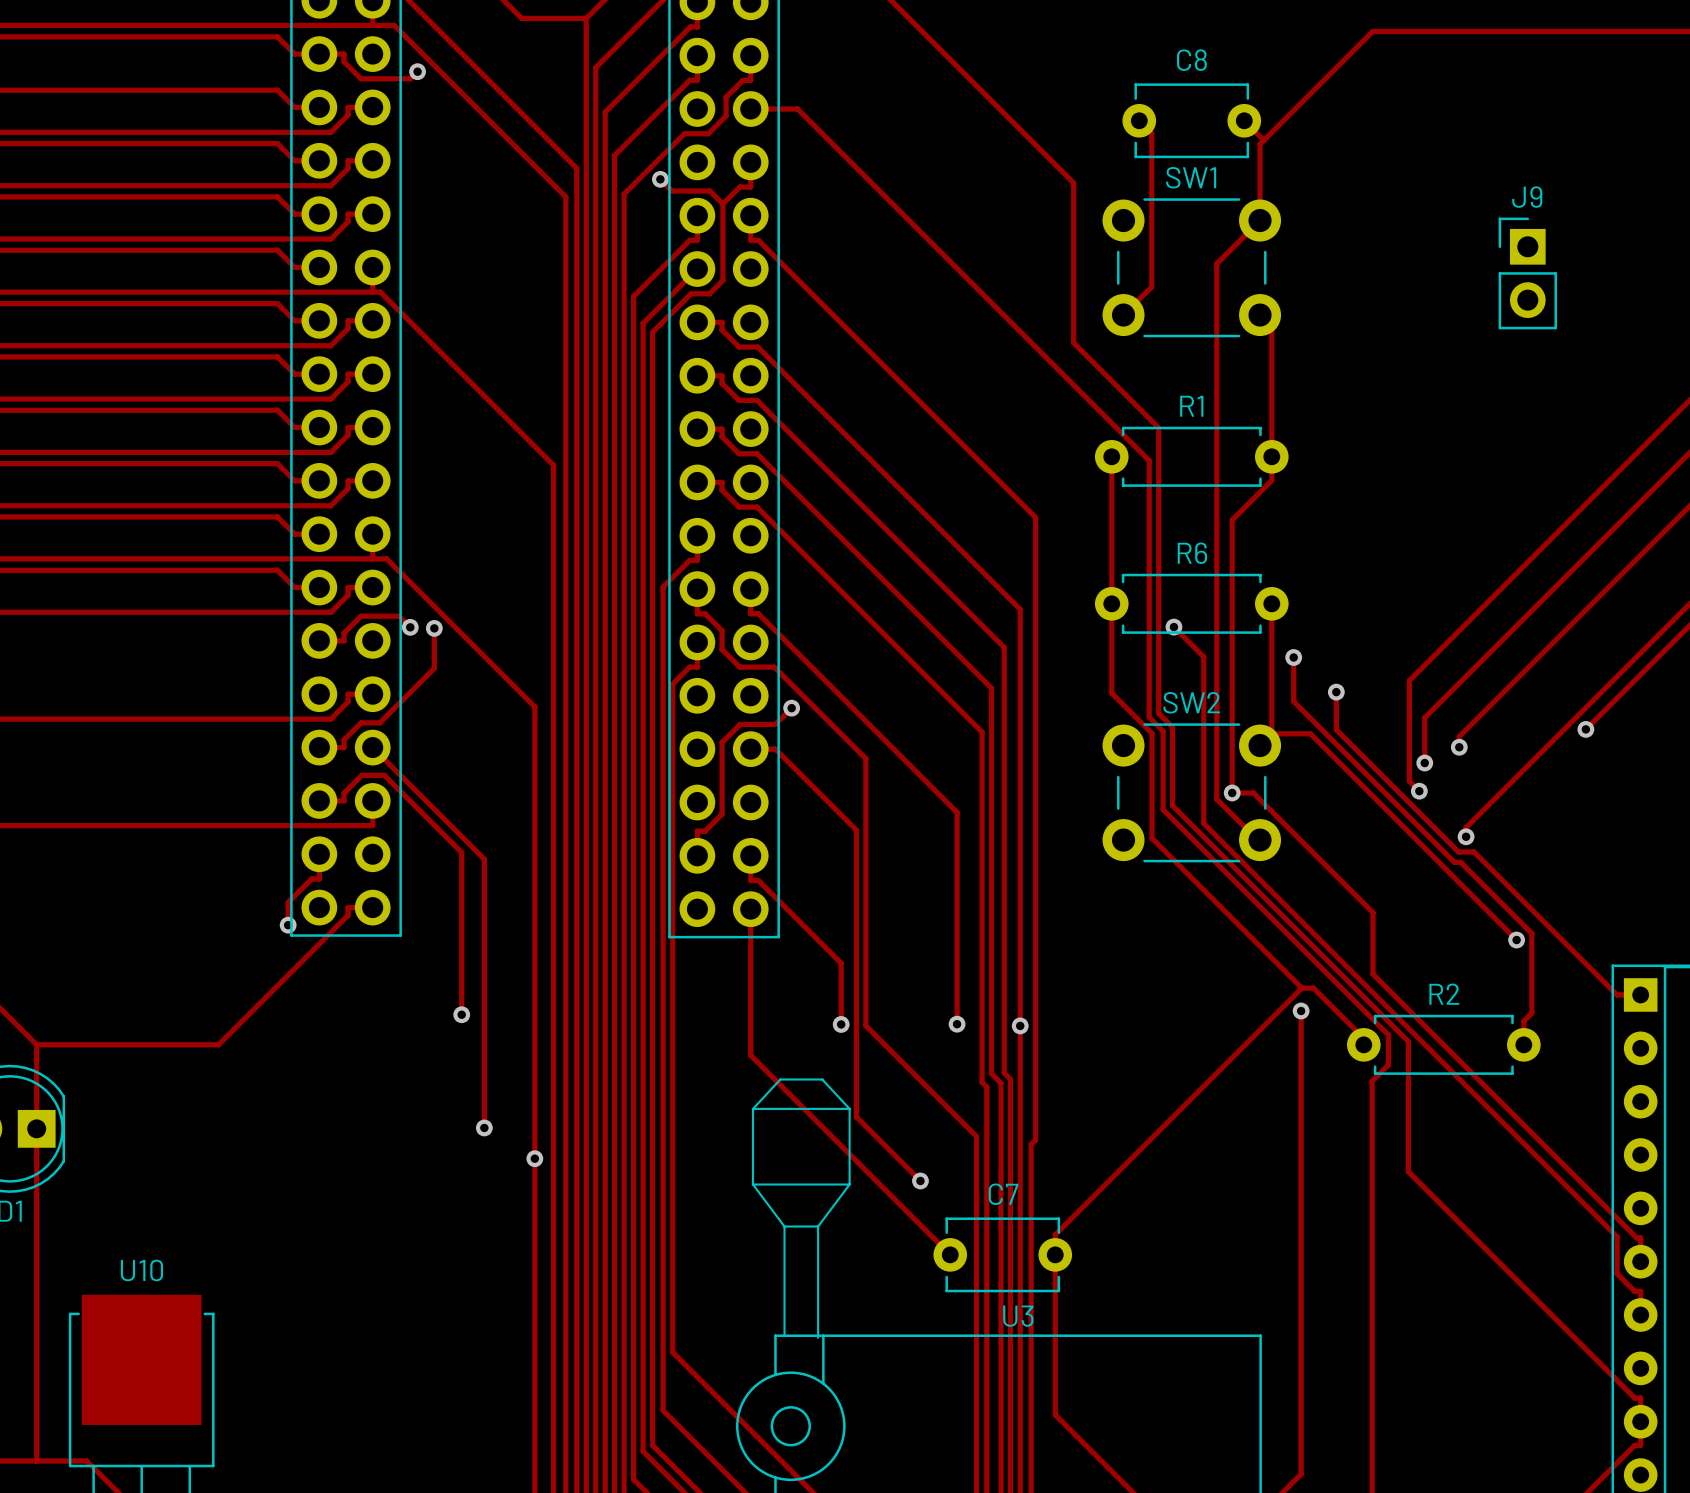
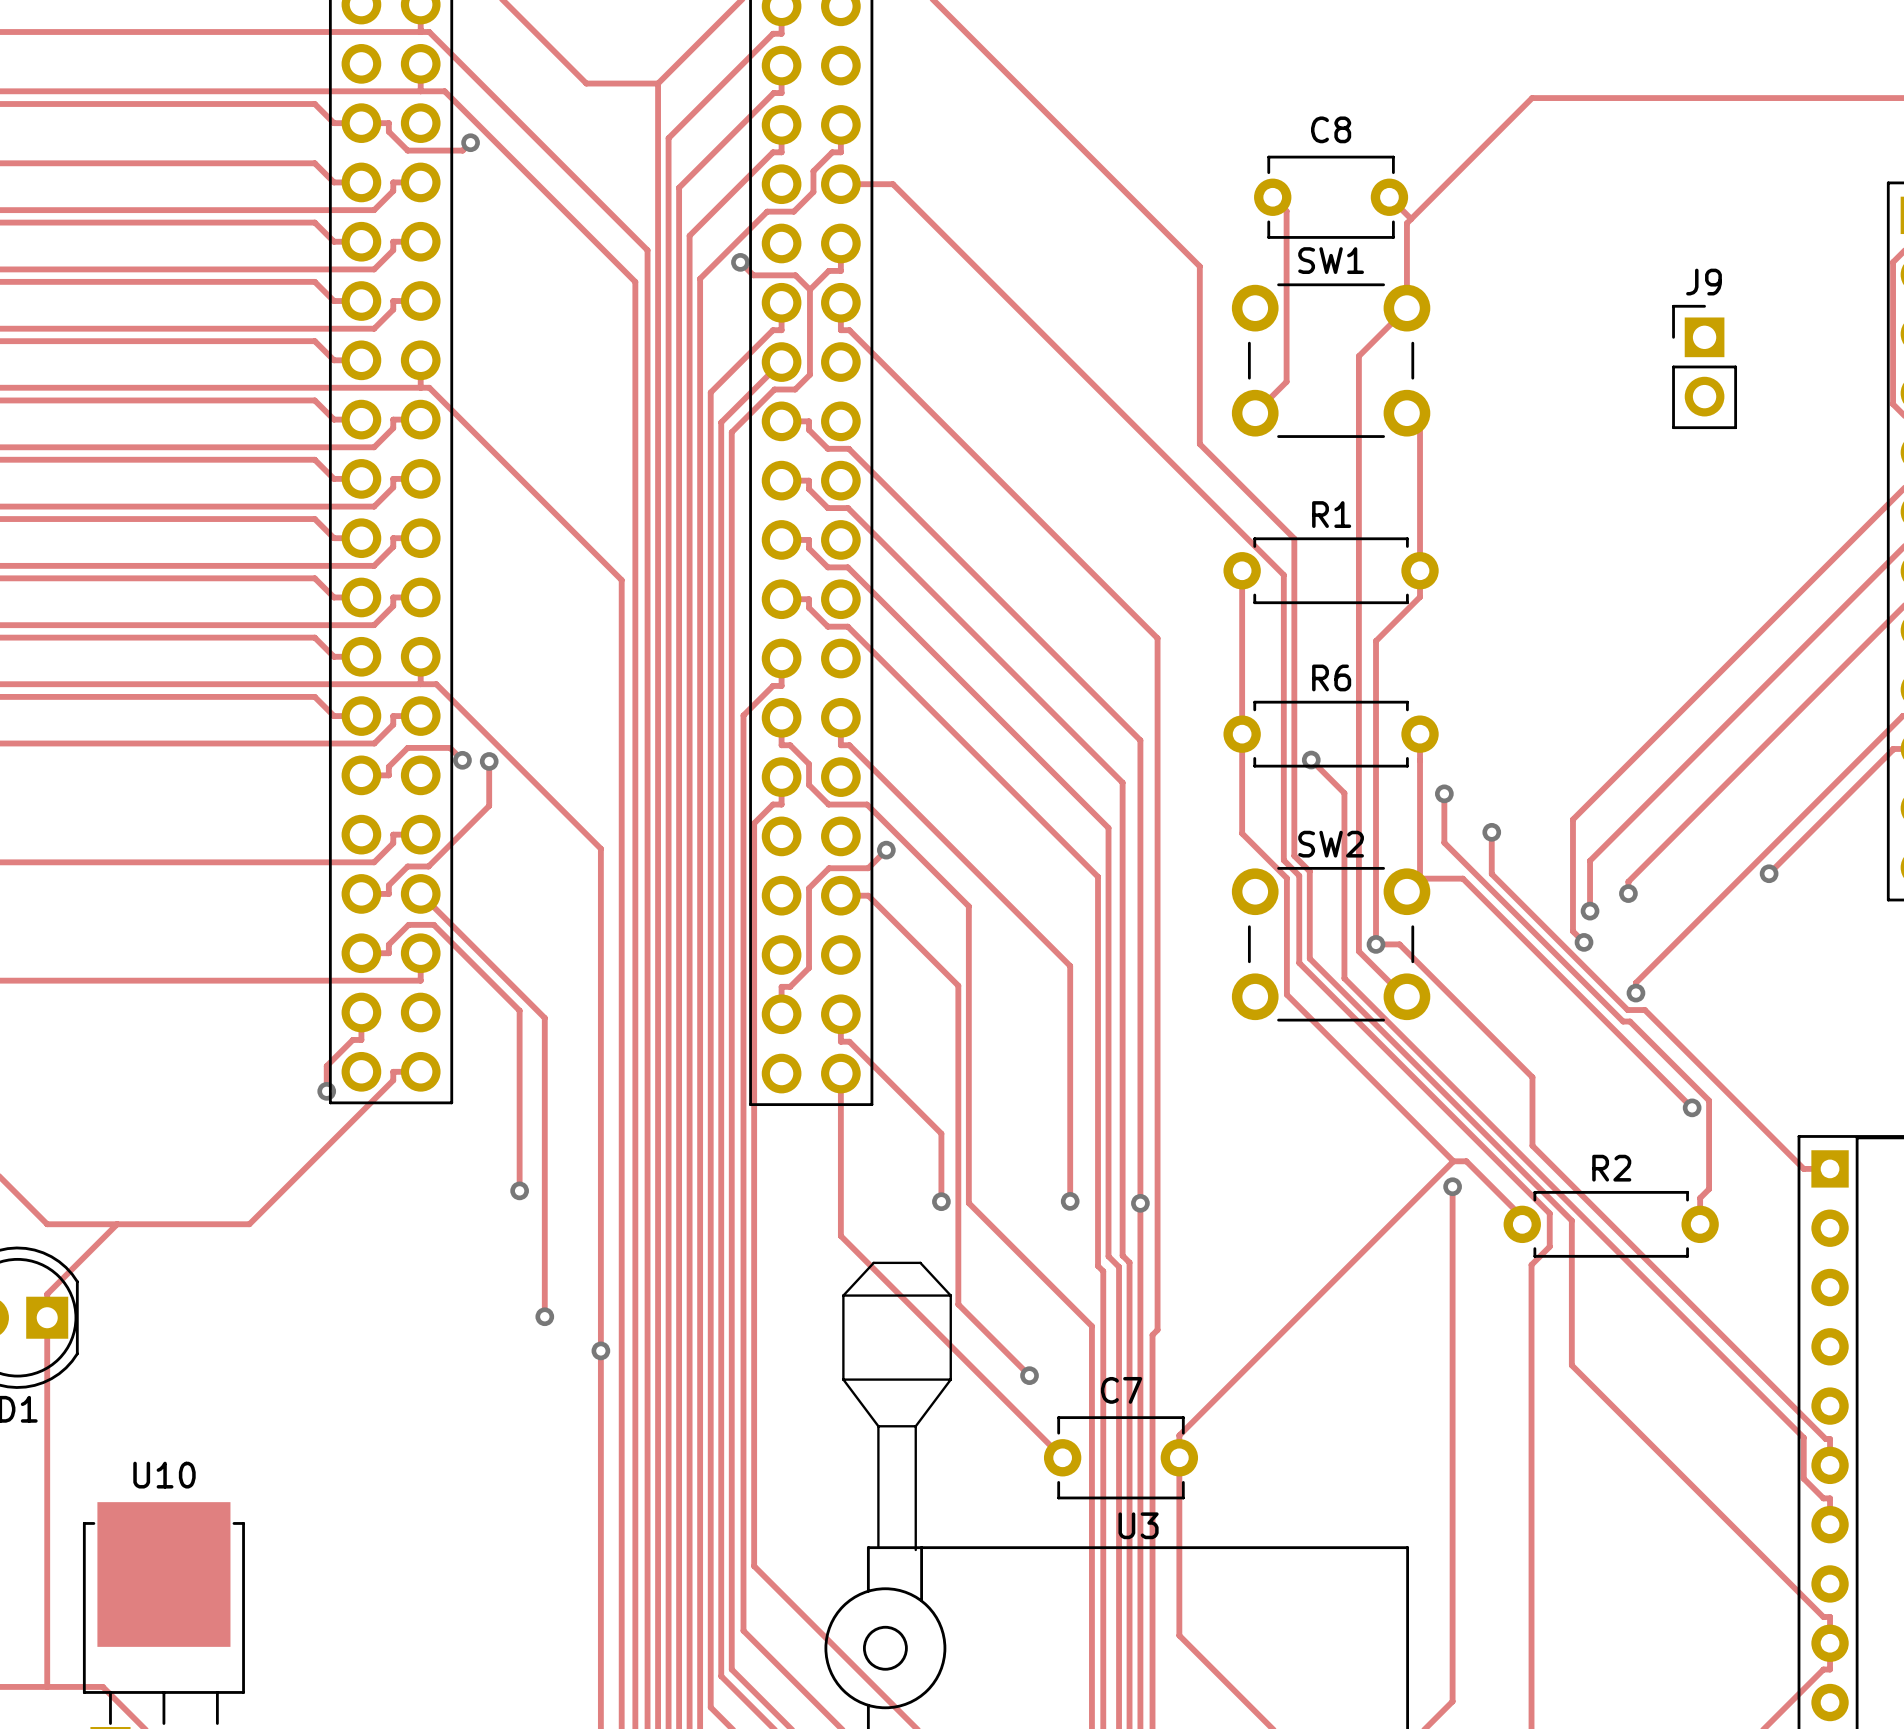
track: (36, 1044) (36, 1107) -> (117, 1224) (47, 1294)

